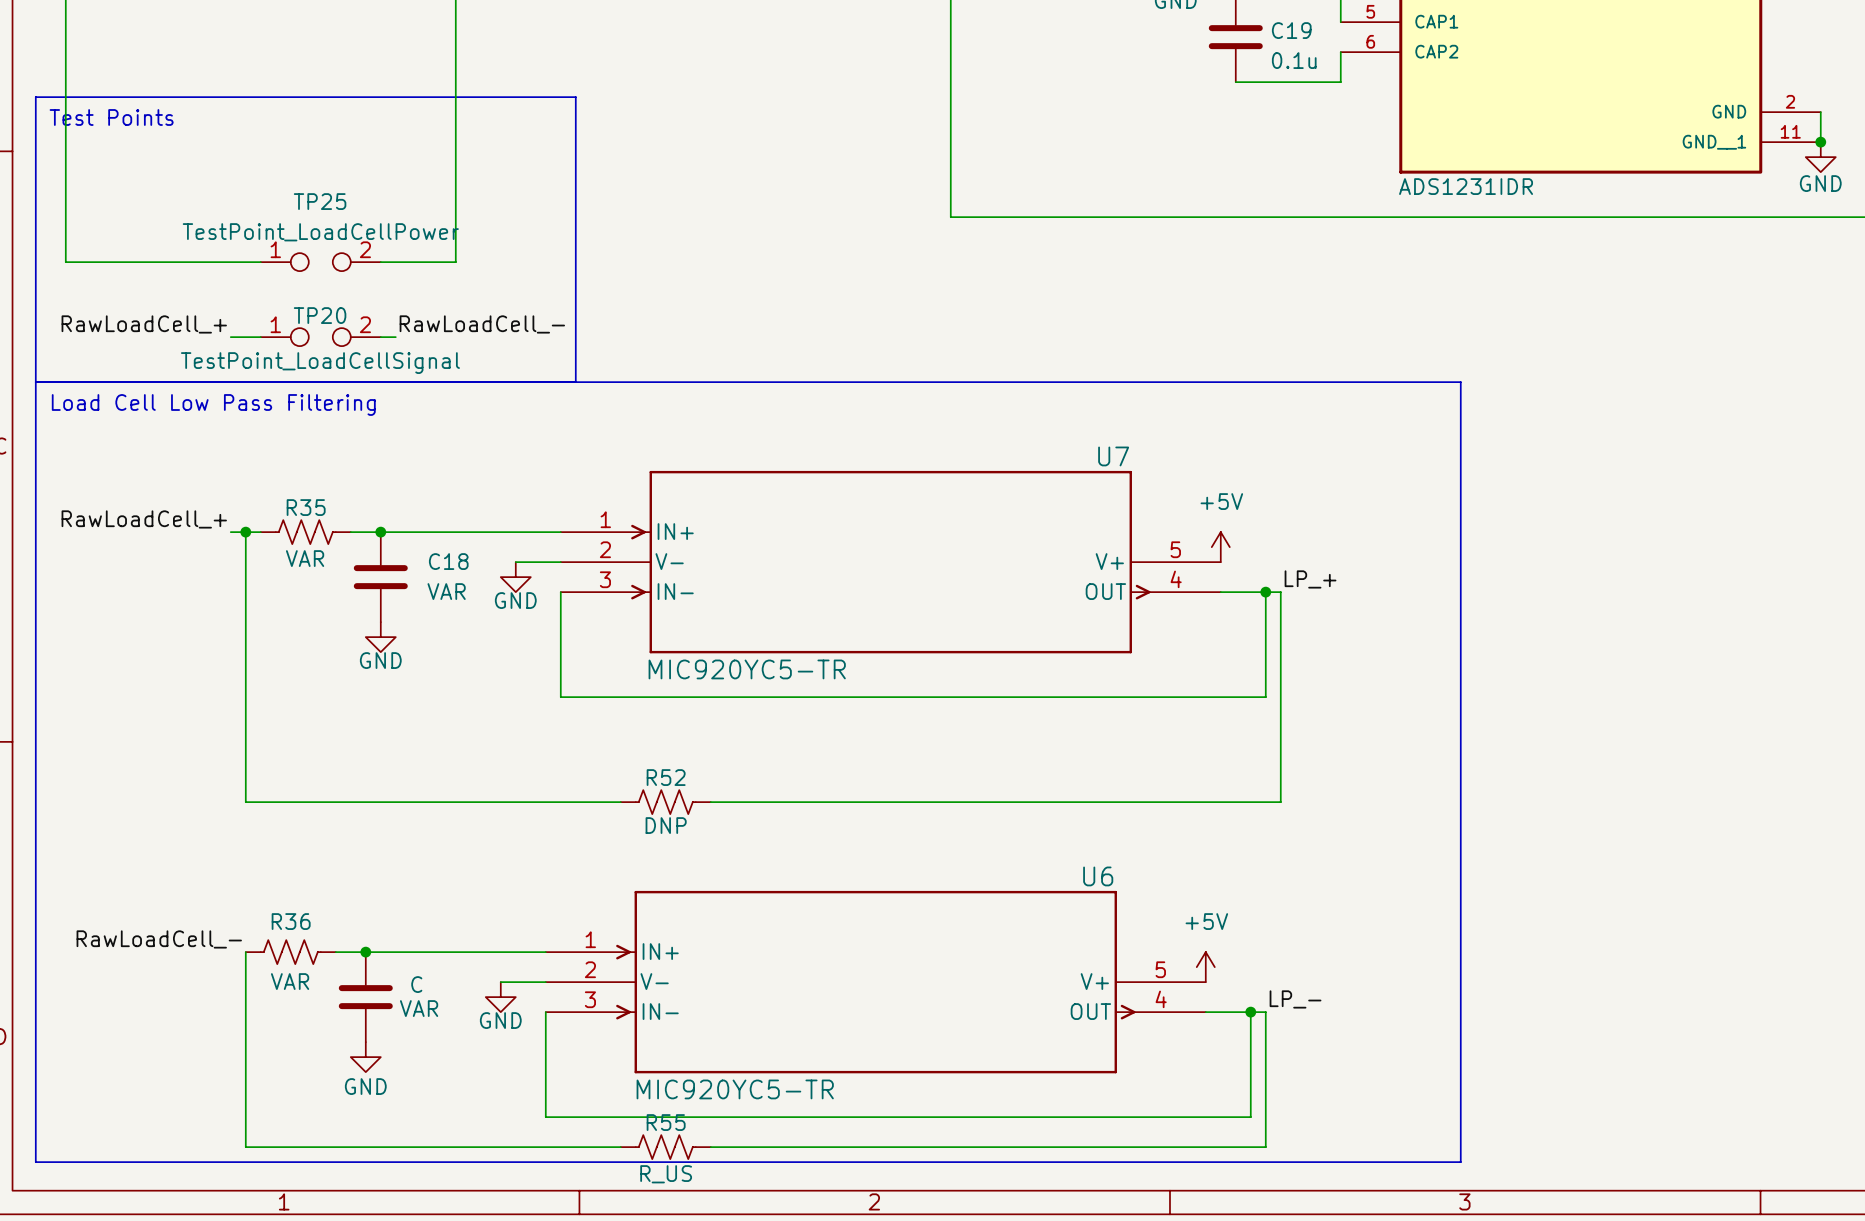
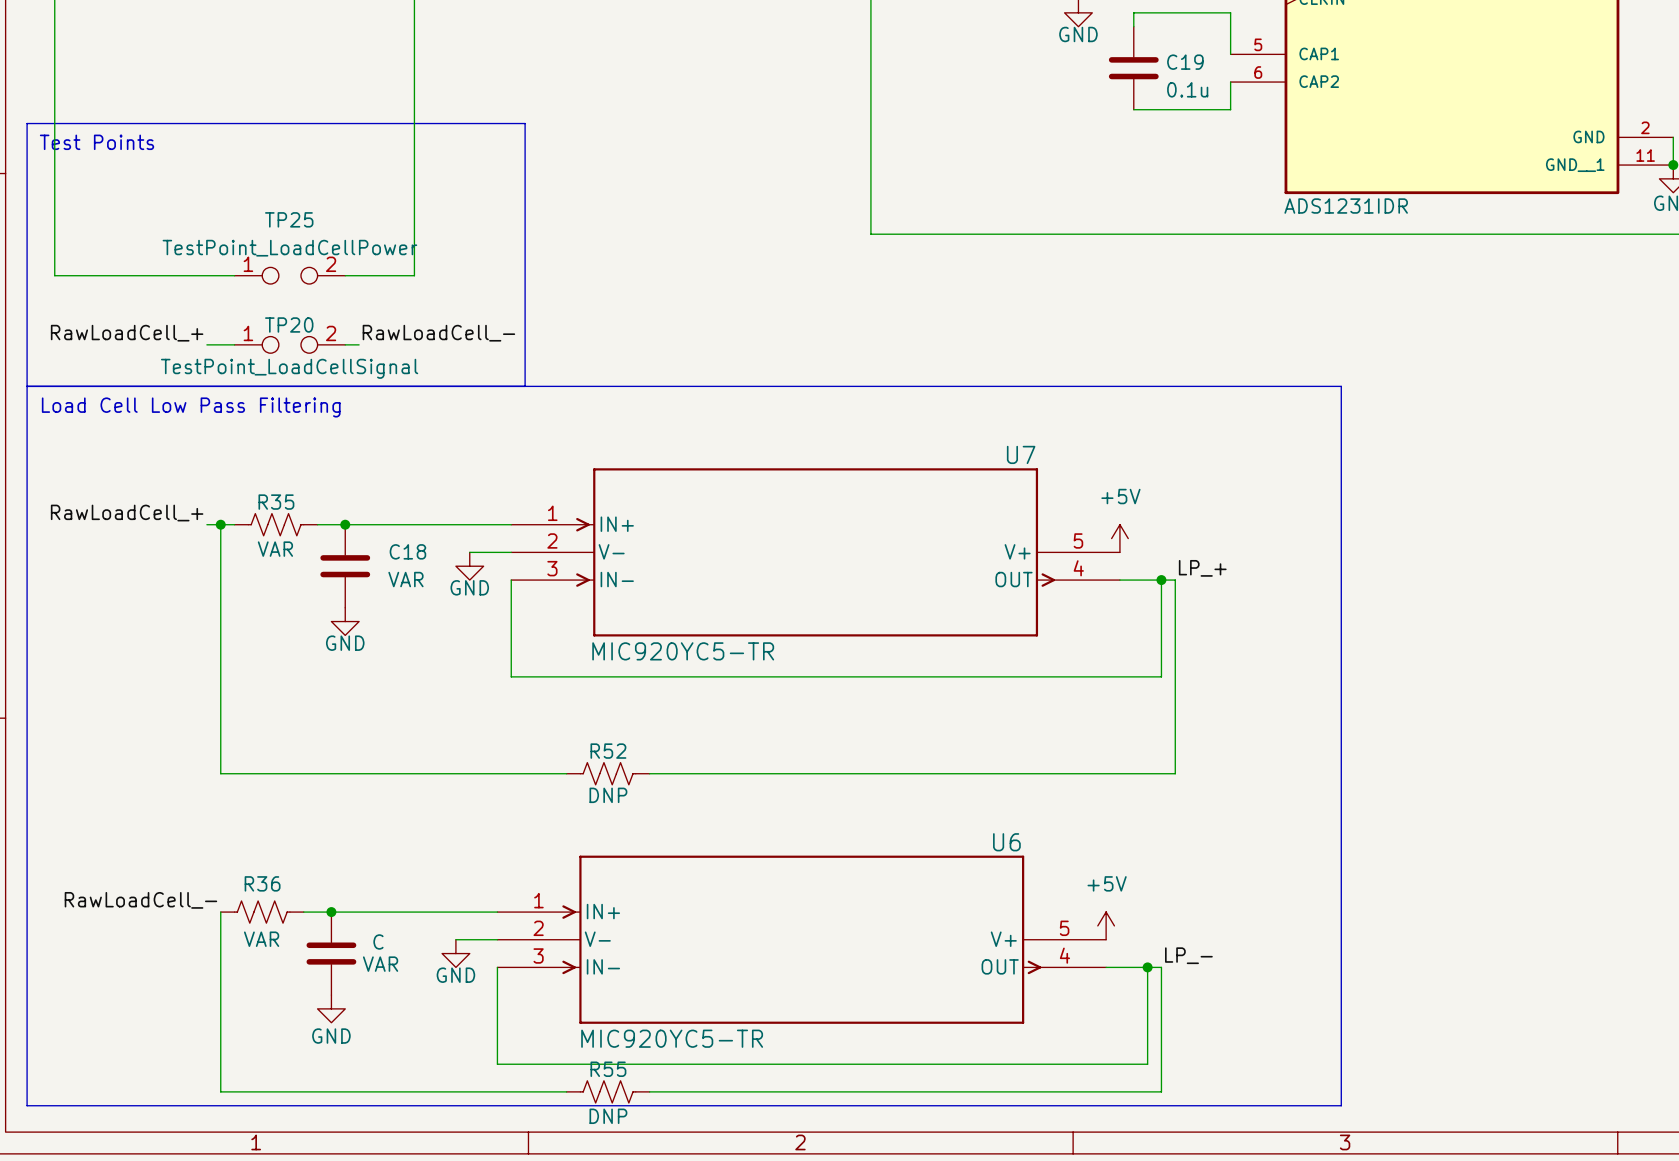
R55 value: R_US (666, 1174) -> DNP (608, 1116)

